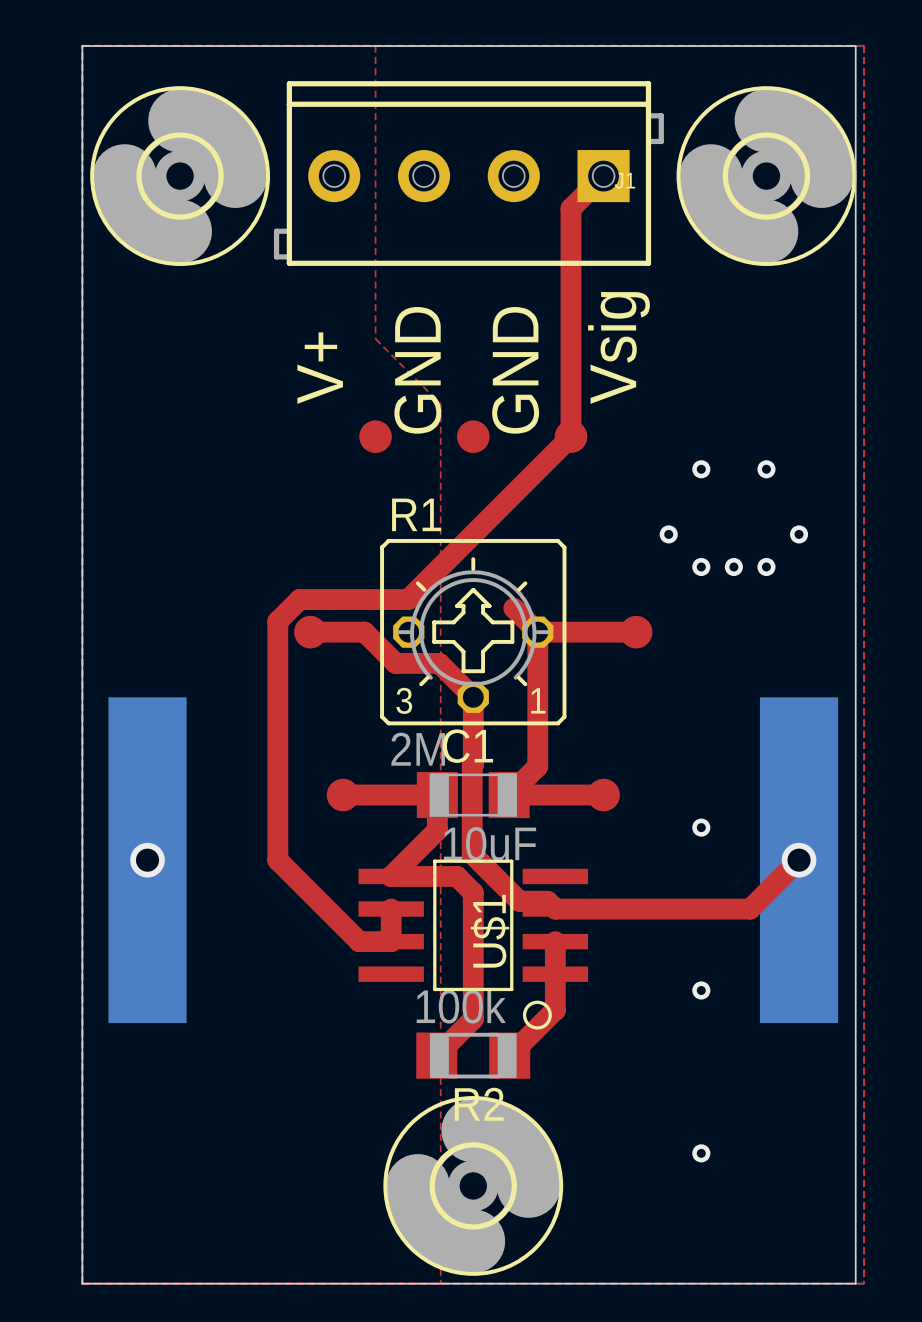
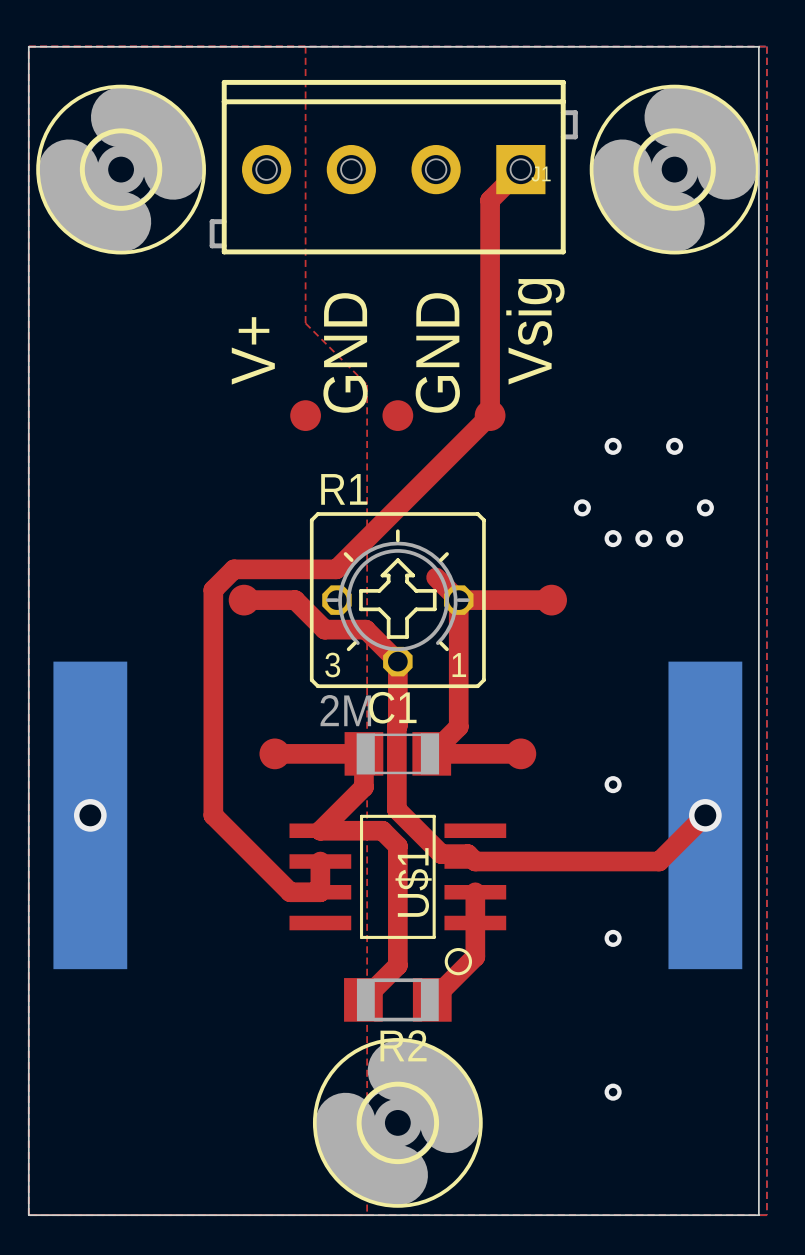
C1 value: 10uF (490, 843) -> none
part value: 100k (461, 1006) -> none

